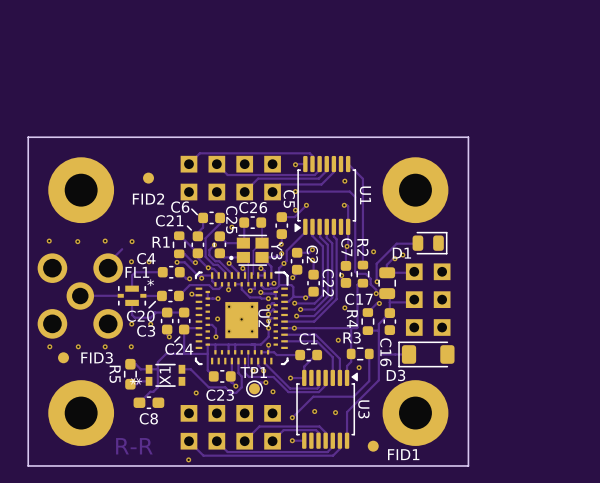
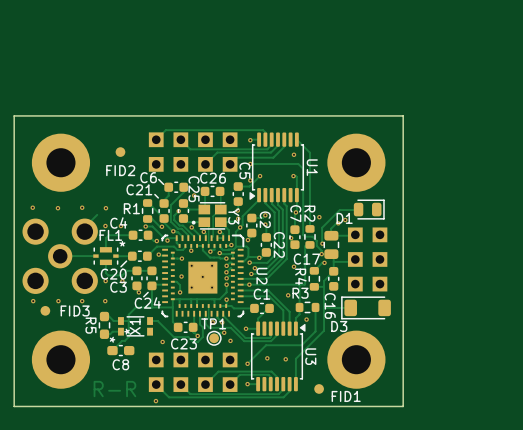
U2 name position: U2 (264, 318) -> U2 (261, 276)
X1 footprint: [145, 363, 186, 387] -> [118, 316, 153, 337]

